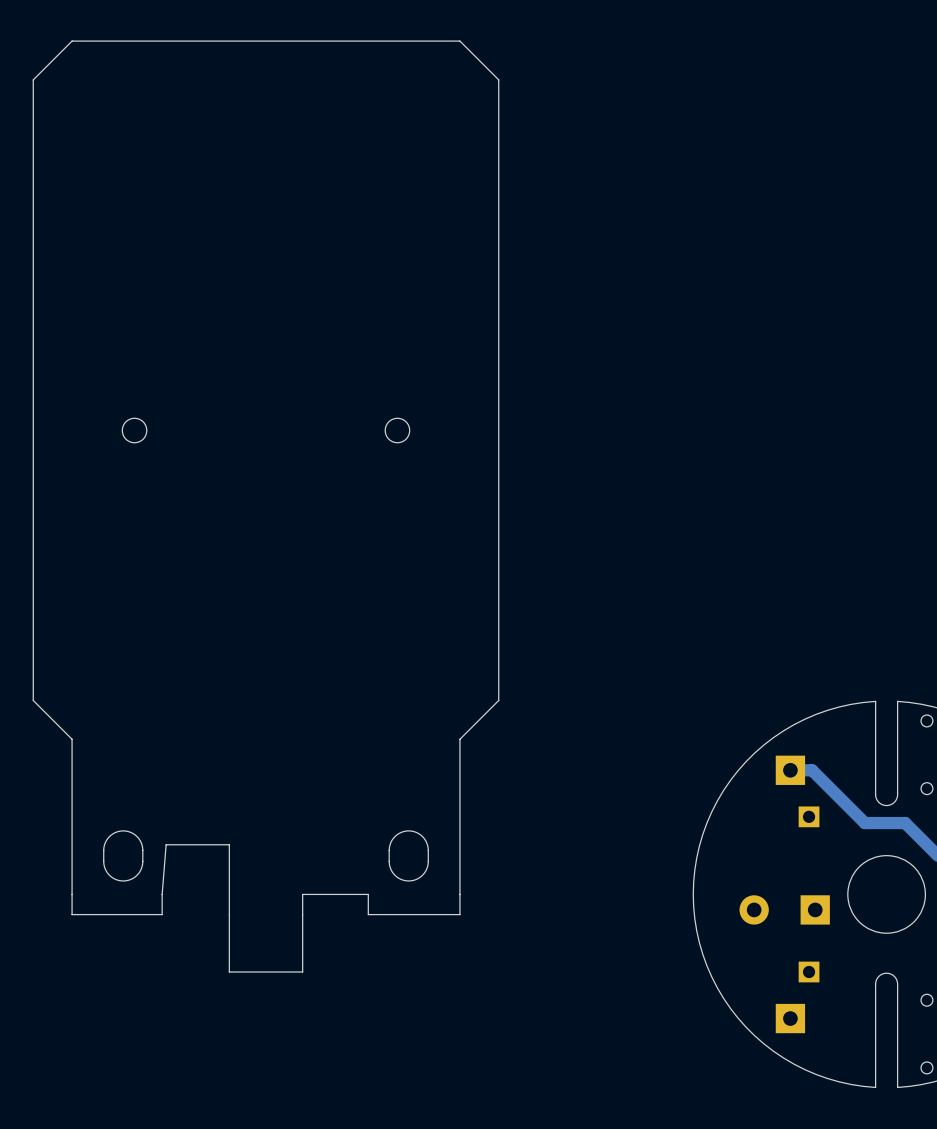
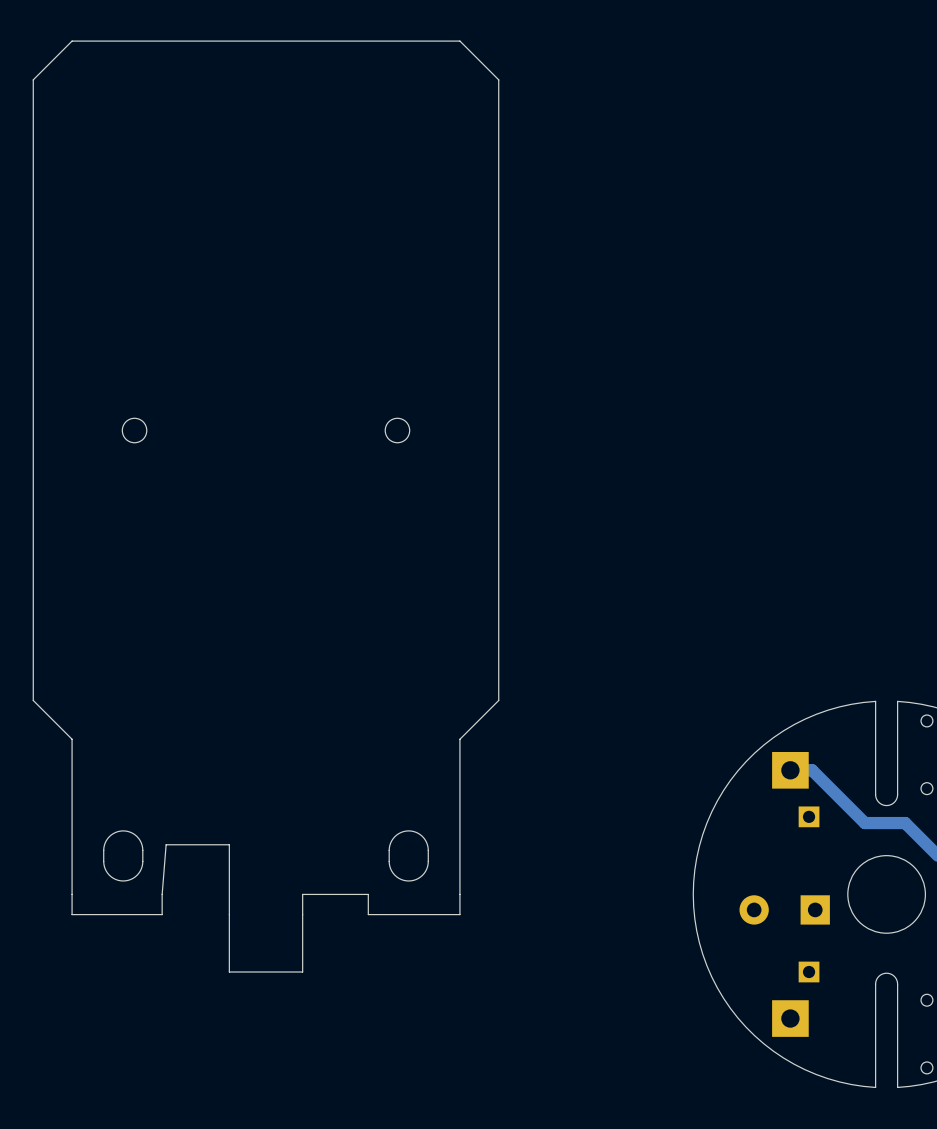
part footprint: [775, 755, 806, 785] -> [772, 751, 809, 789]
part footprint: [775, 1003, 806, 1034] -> [772, 1000, 809, 1037]

